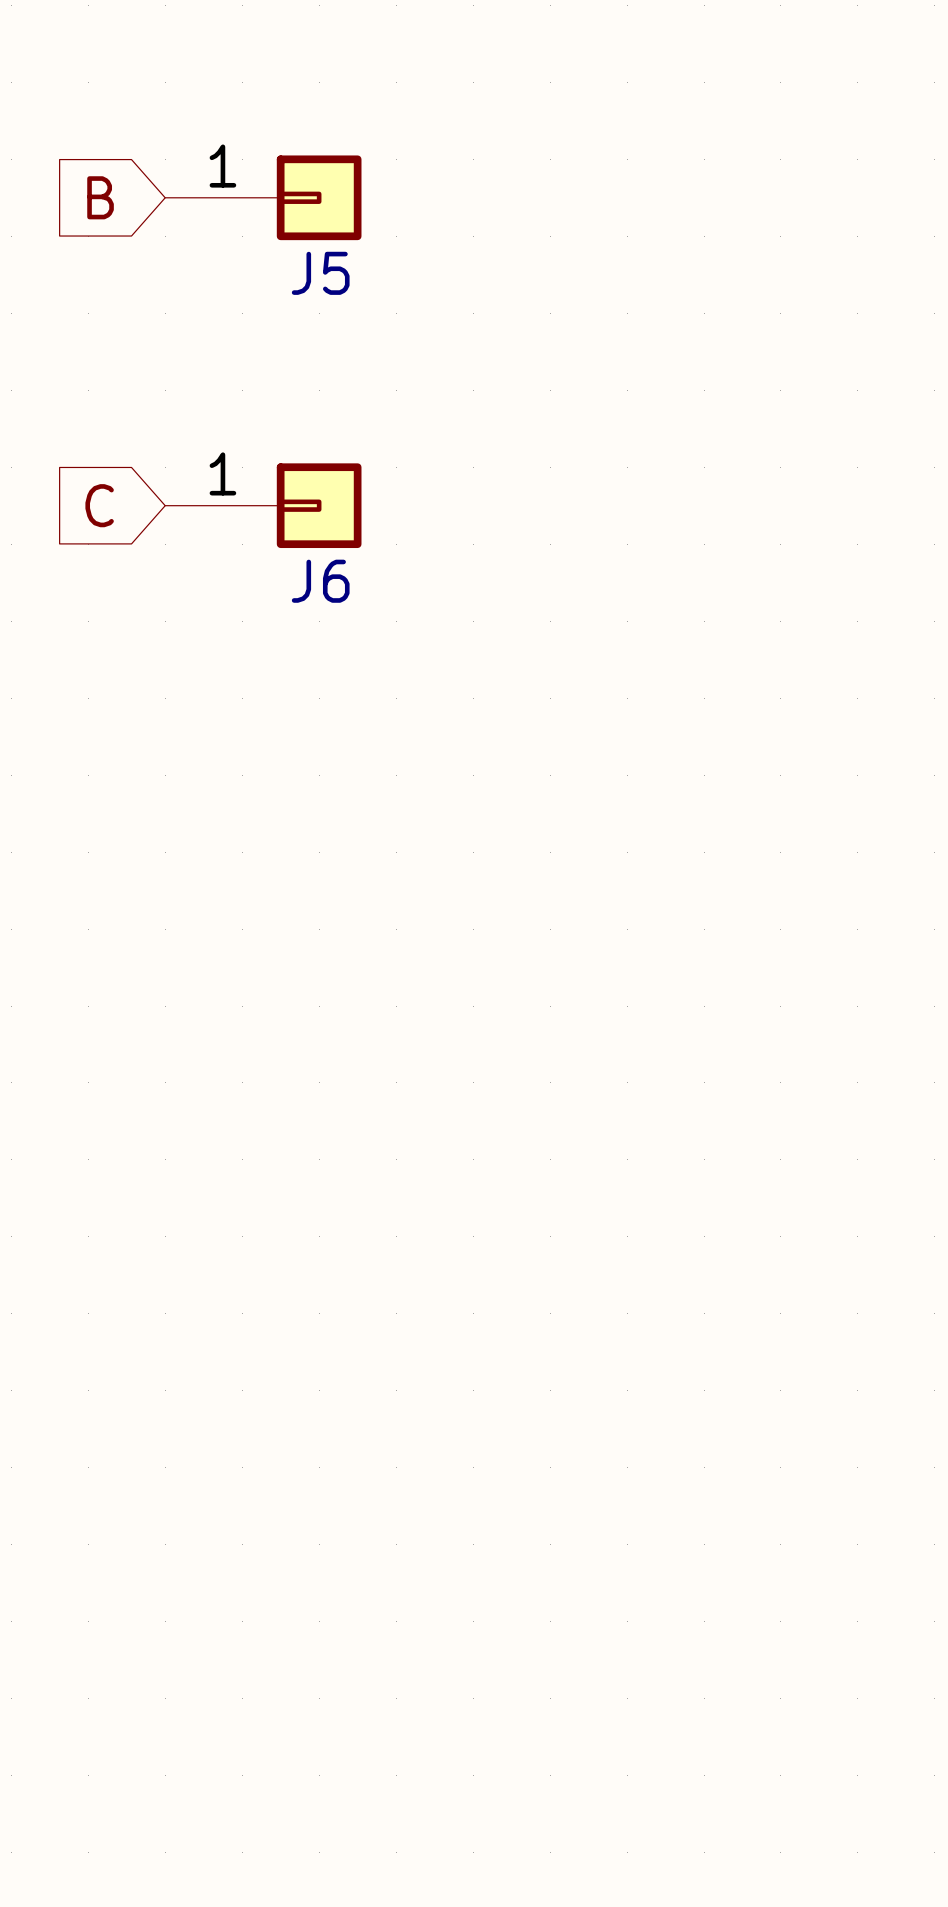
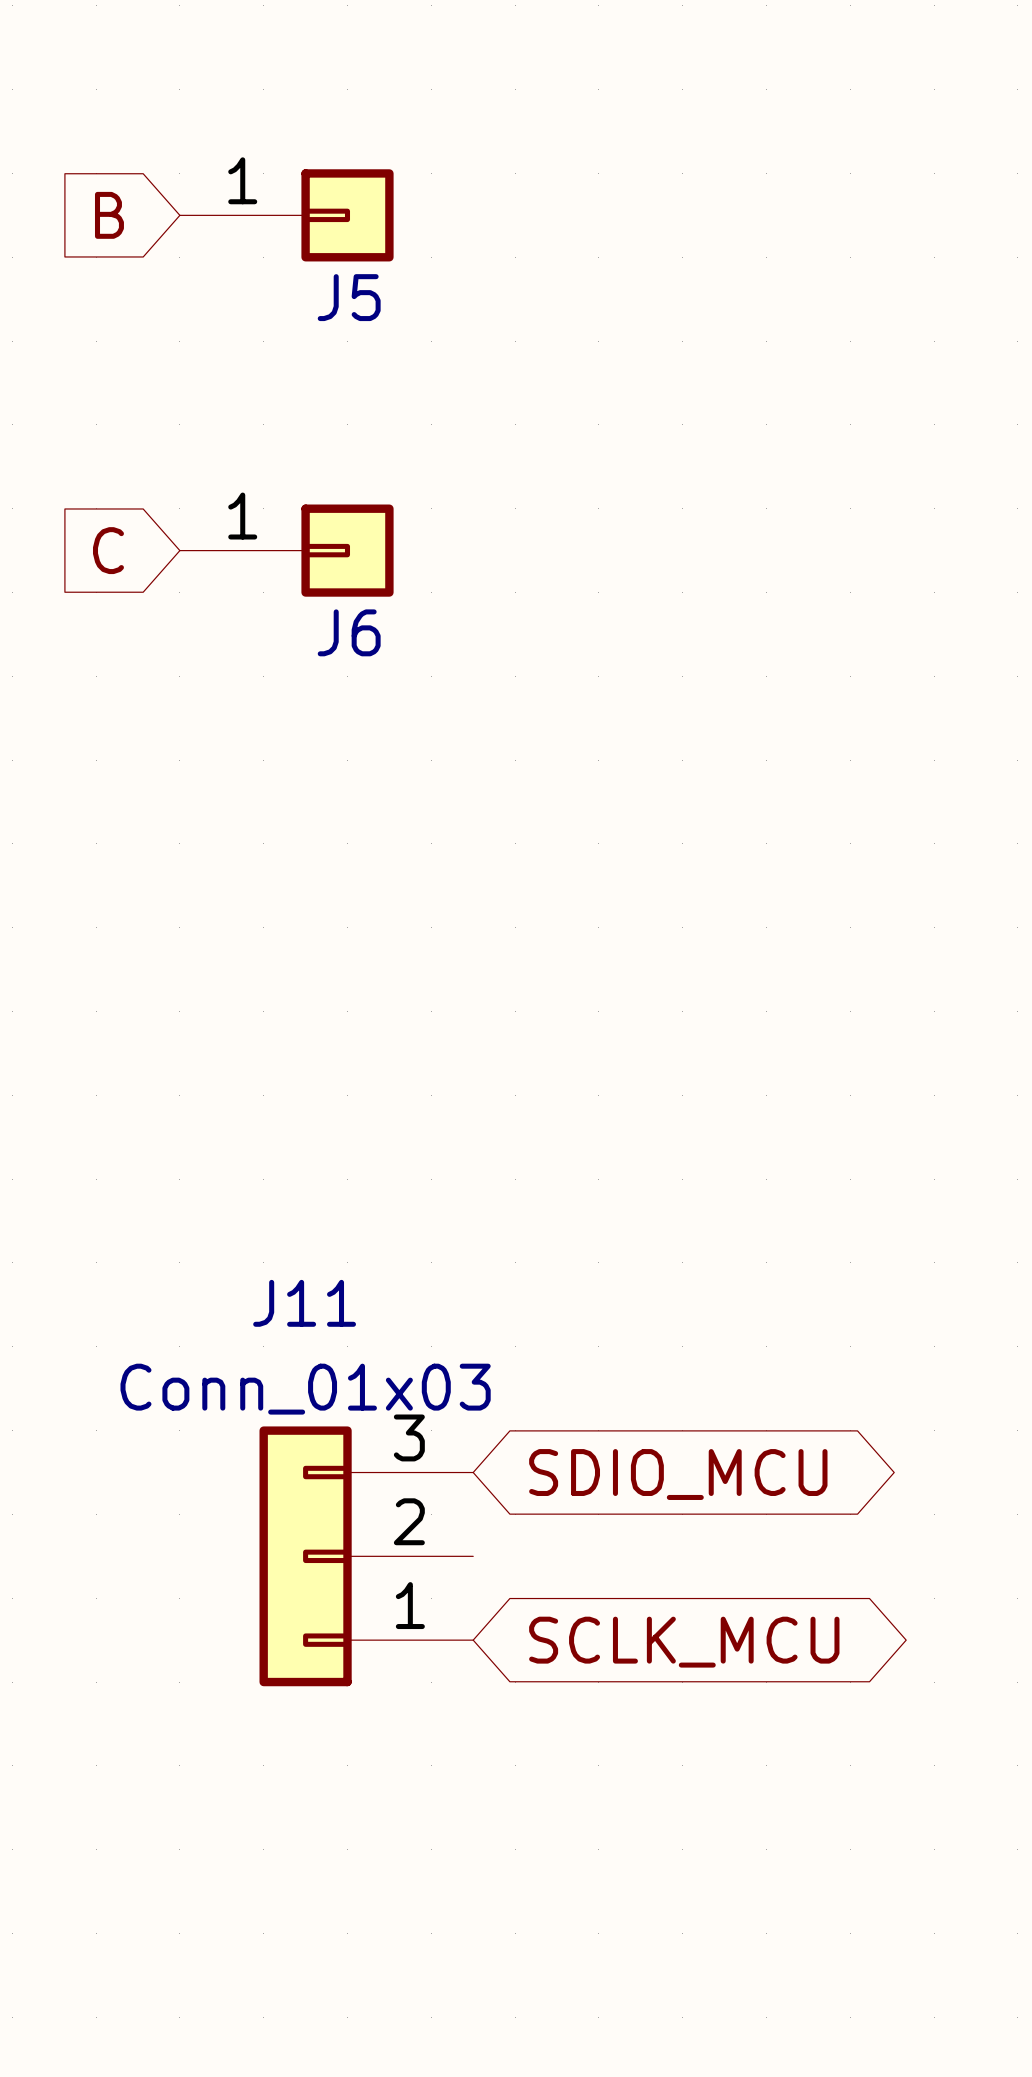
global label: none -> SDIO_MCU (678, 1474)
J11: none -> Conn_01x03 (366, 1556)
global label: none -> SCLK_MCU (684, 1642)

